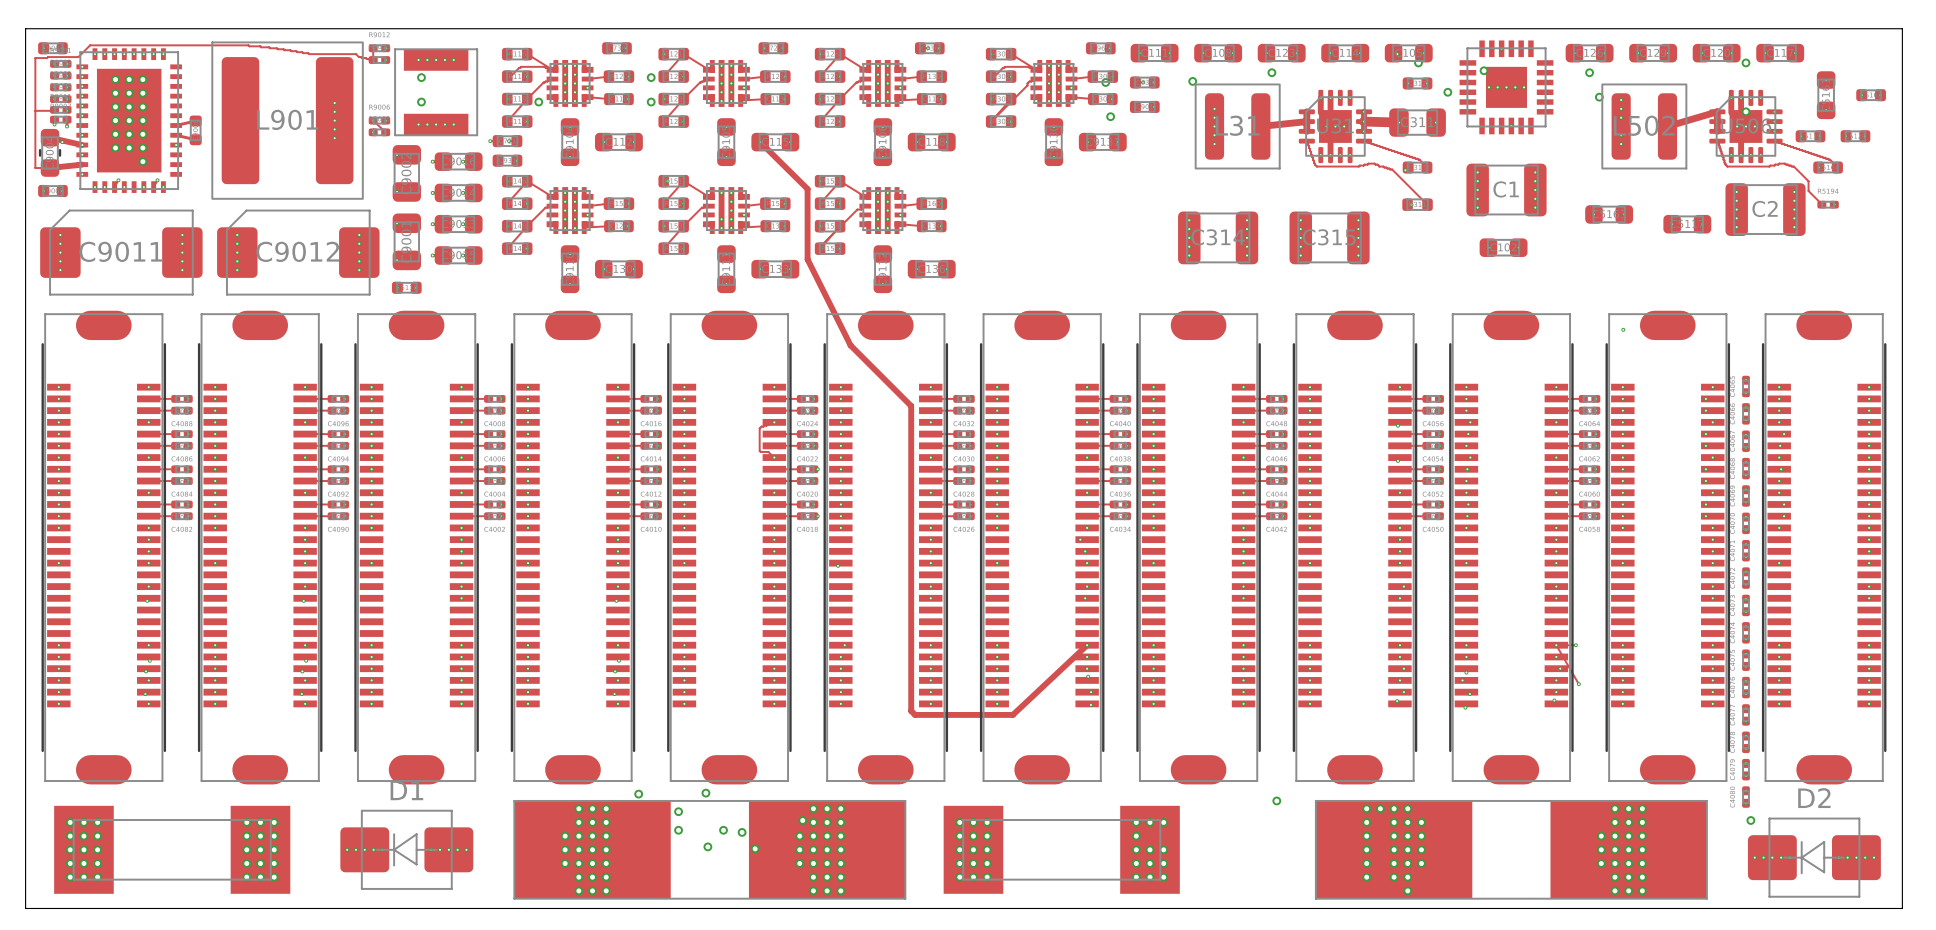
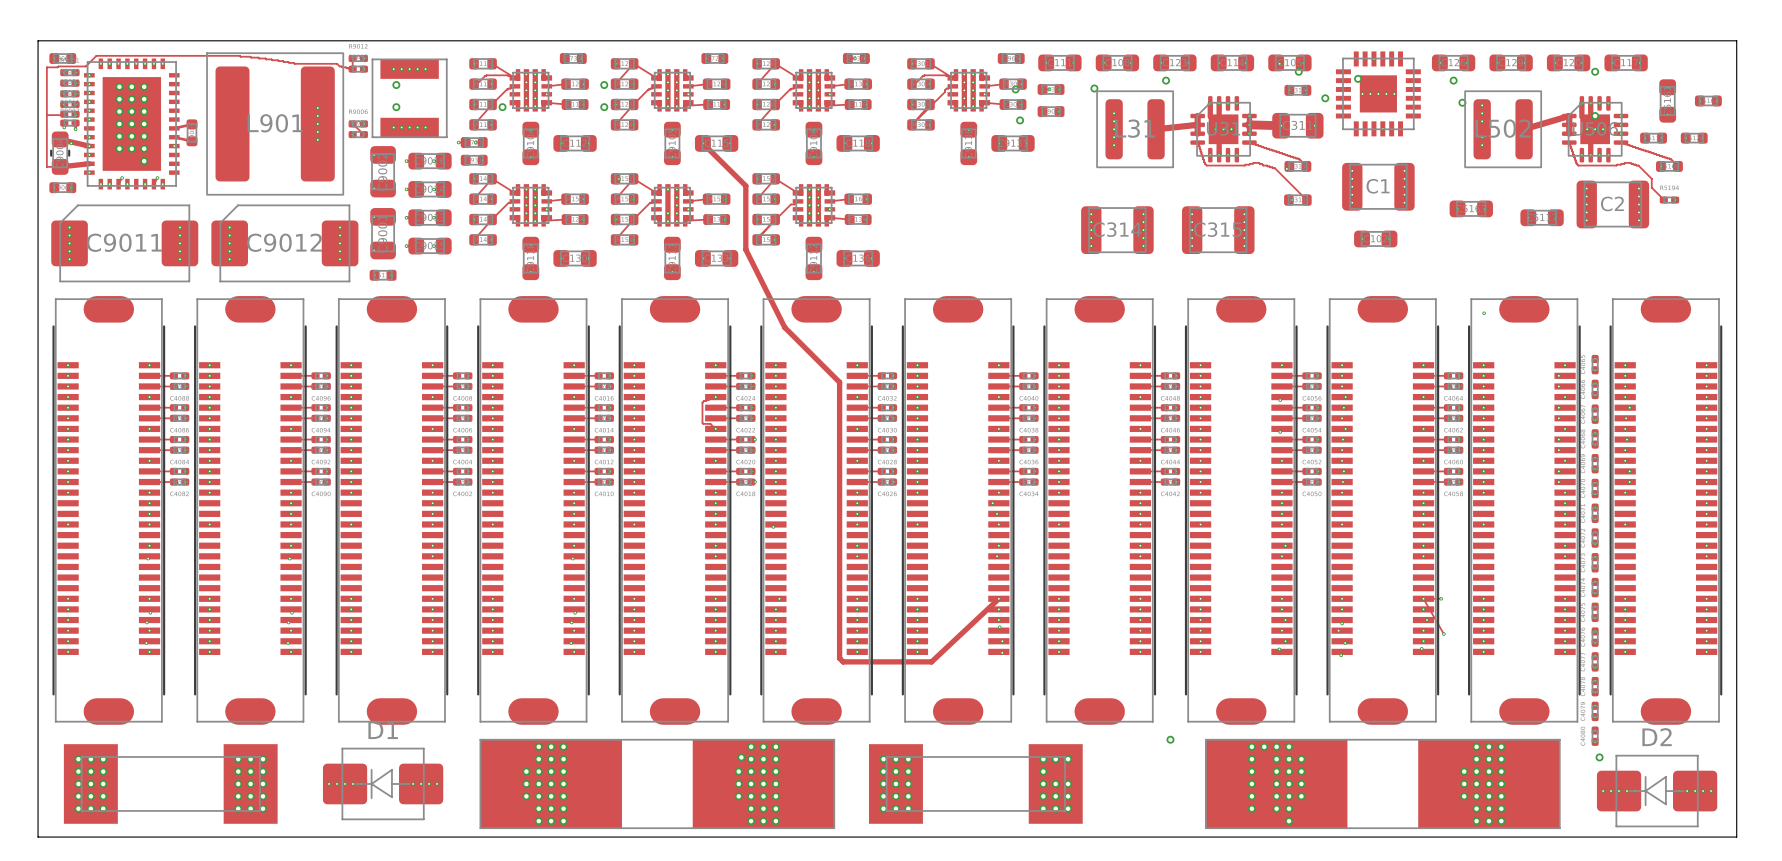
via: (705, 793) -> none
via: (638, 794) -> none
via: (678, 811) -> none
via: (678, 830) -> none
via: (723, 830) -> none
via: (742, 832) -> none
via: (707, 846) -> none
via: (755, 848) -> none

